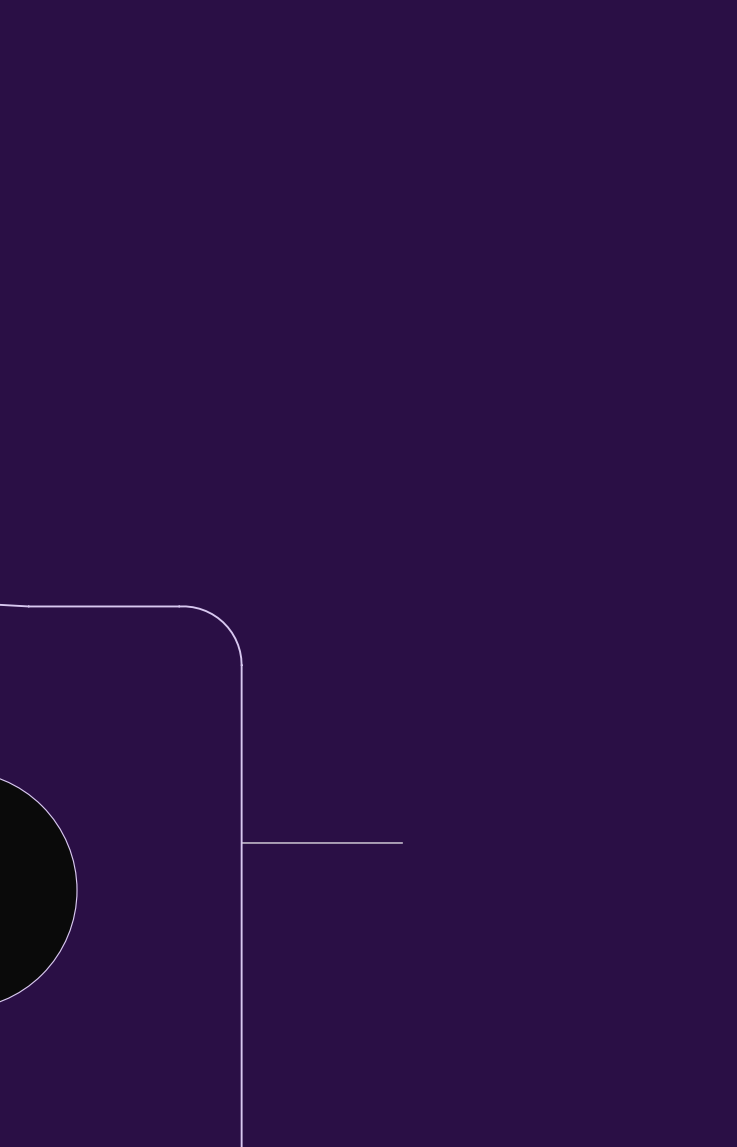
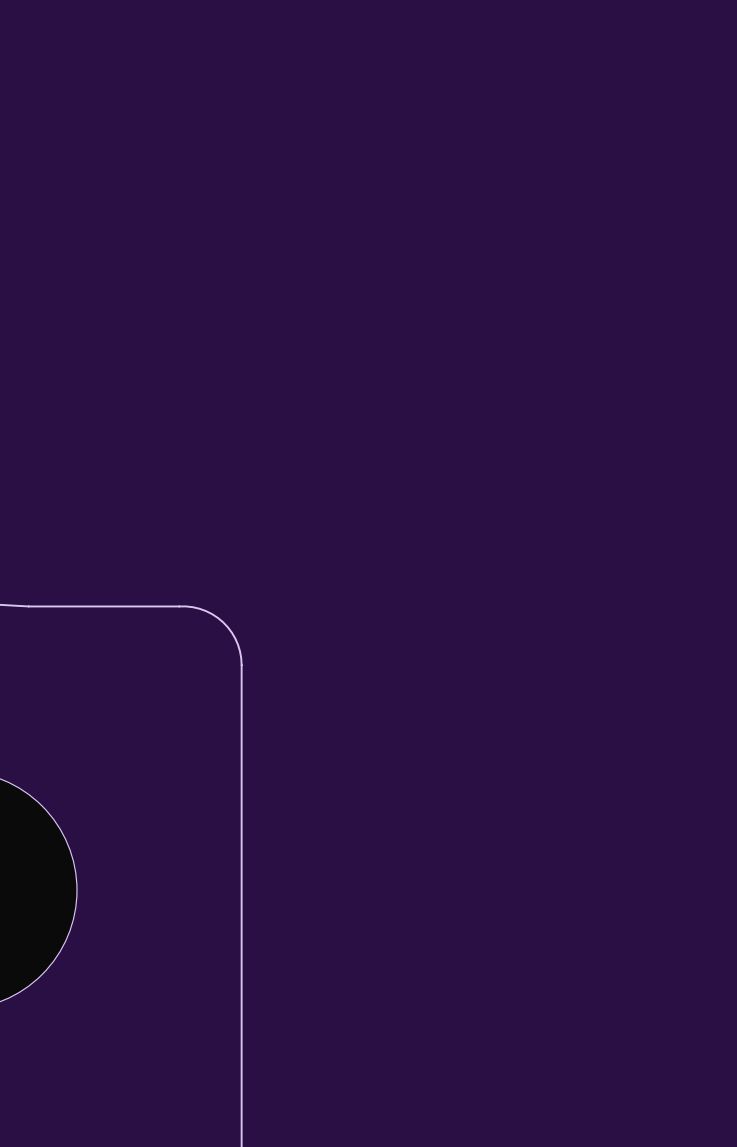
line: (241, 842) (402, 842) -> none

